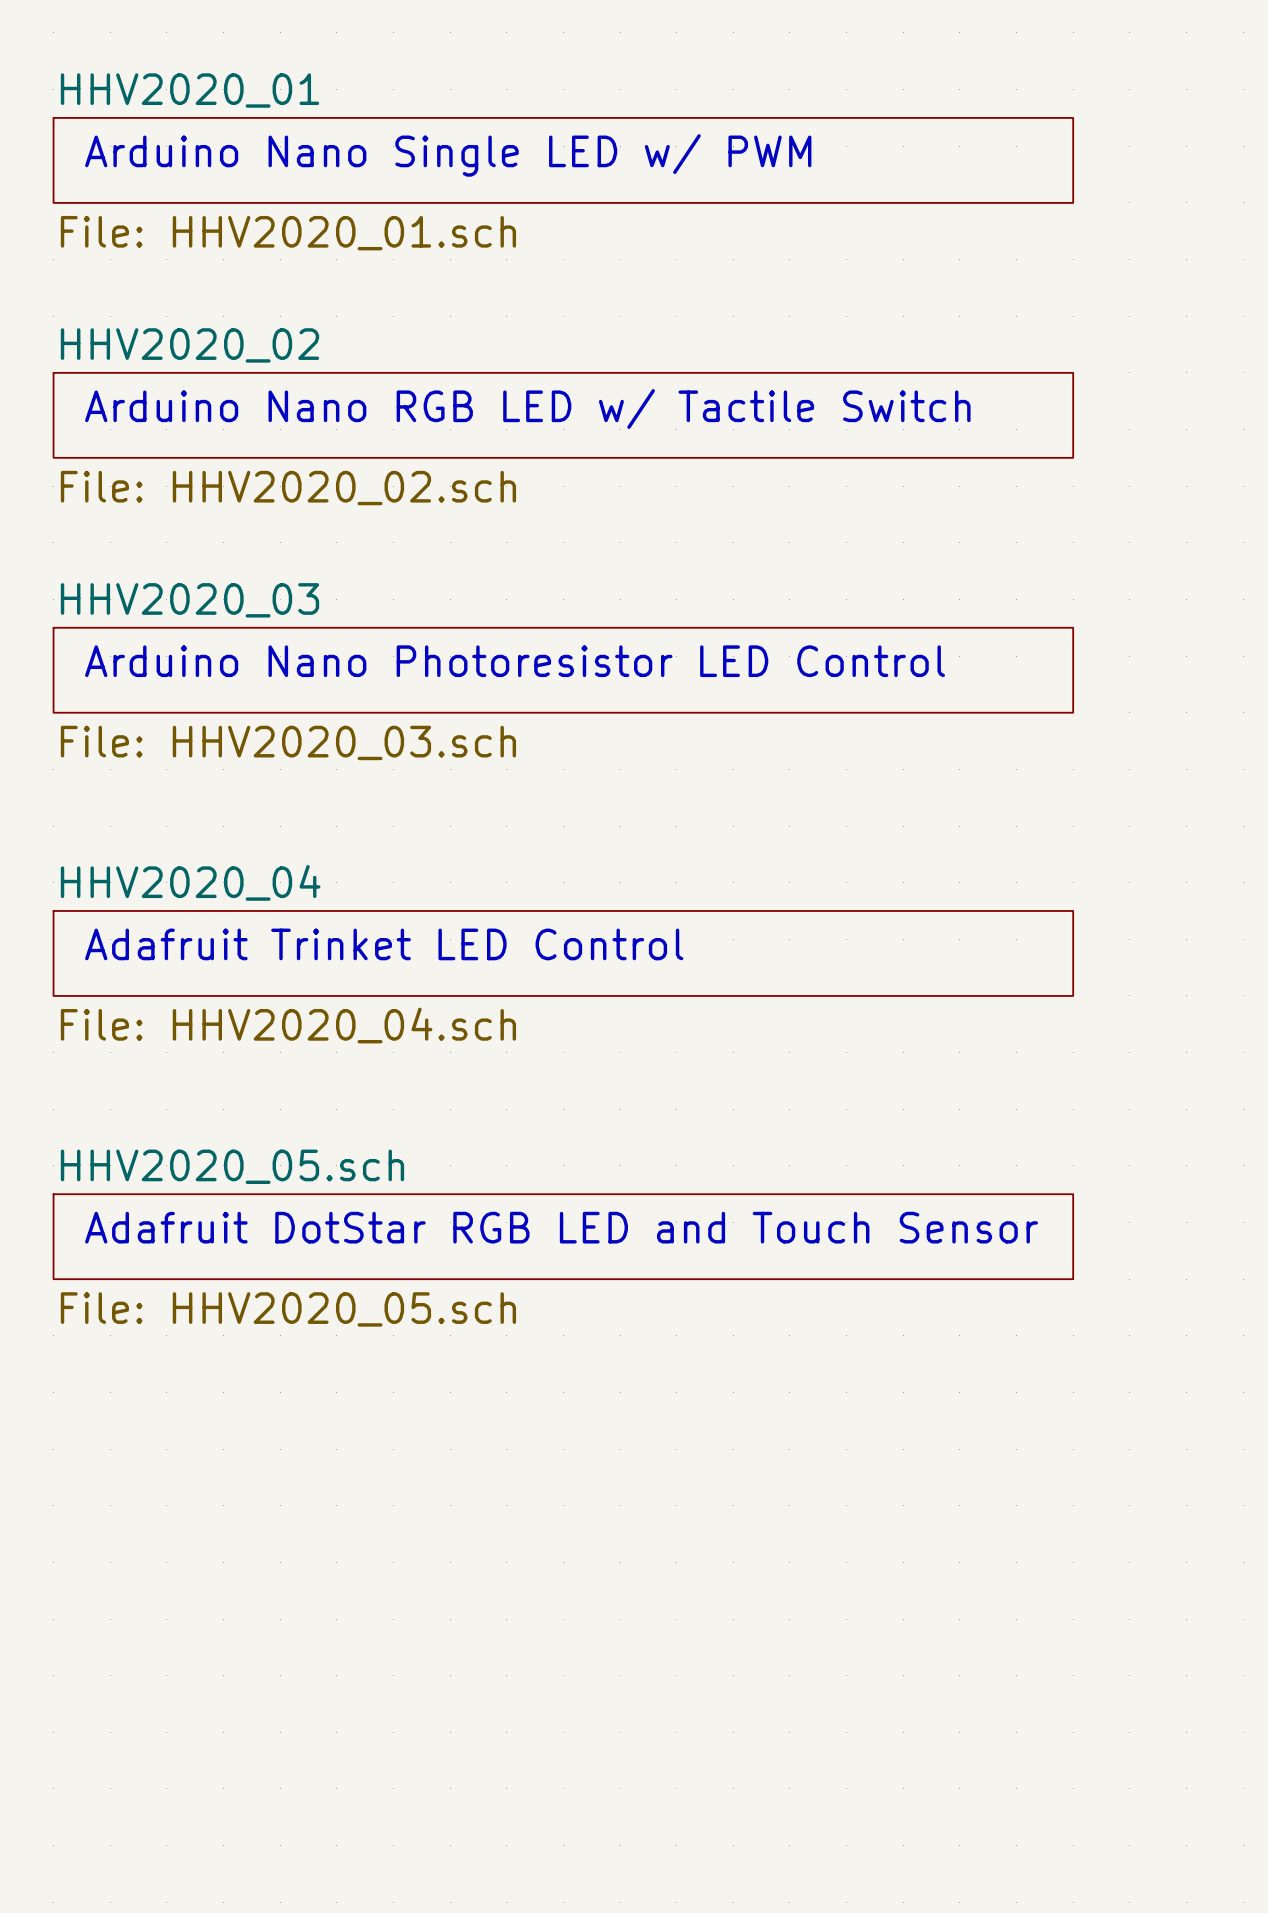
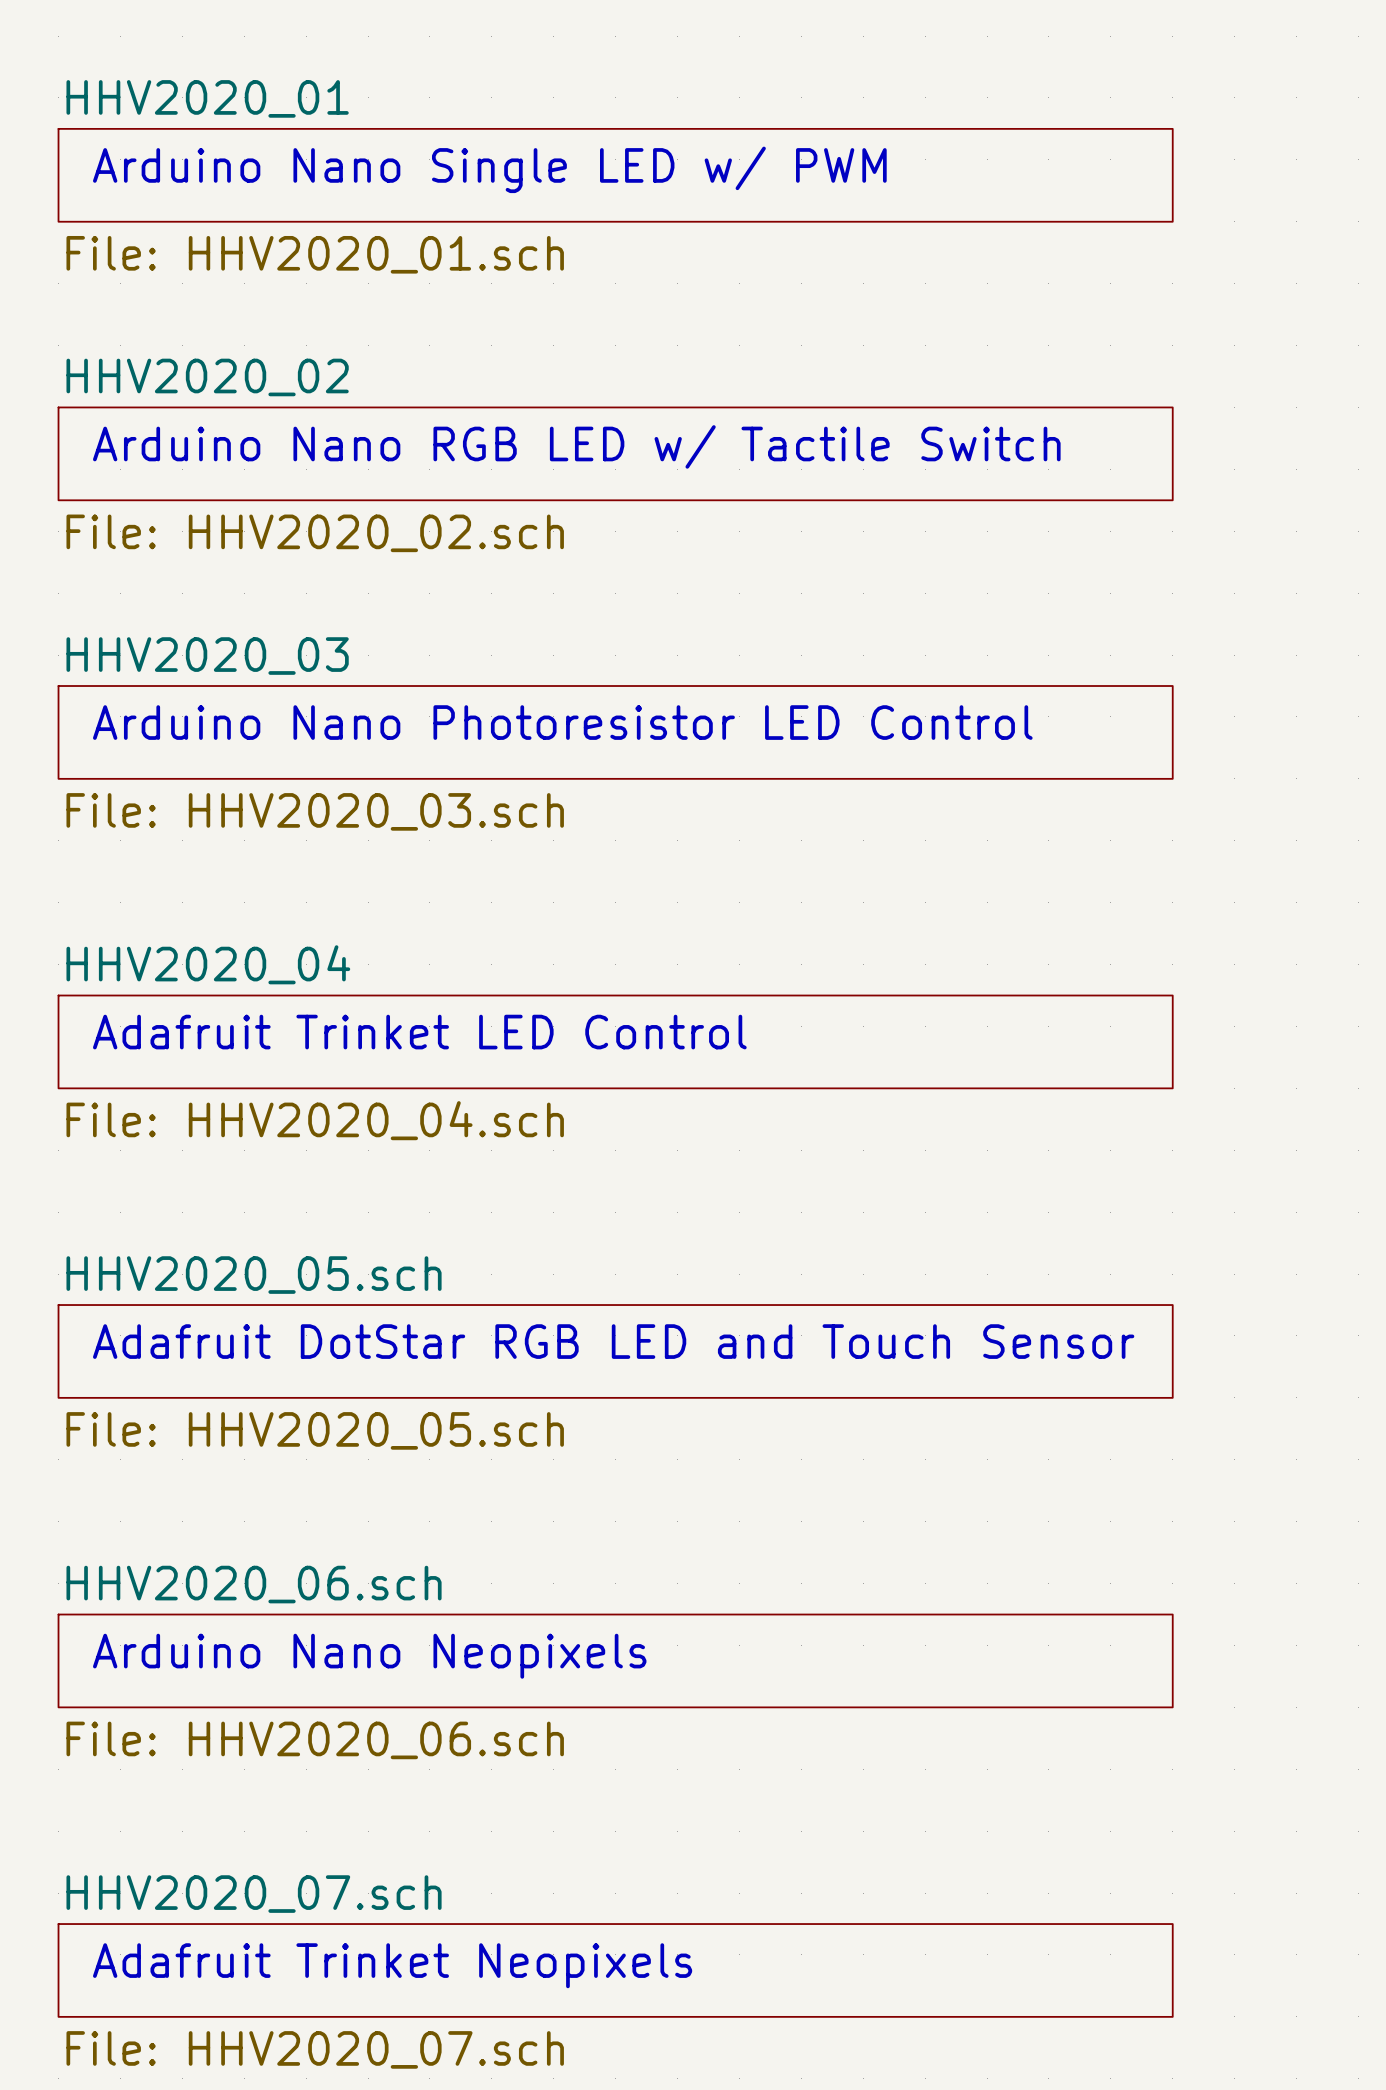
text: none -> Arduino Nano Neopixels (369, 1656)
sheet HHV2020_06.sch: none -> File: HHV2020_06.sch (615, 1660)
text: none -> Adafruit Trinket Neopixels (392, 1965)
sheet HHV2020_07.sch: none -> File: HHV2020_07.sch (615, 1970)

